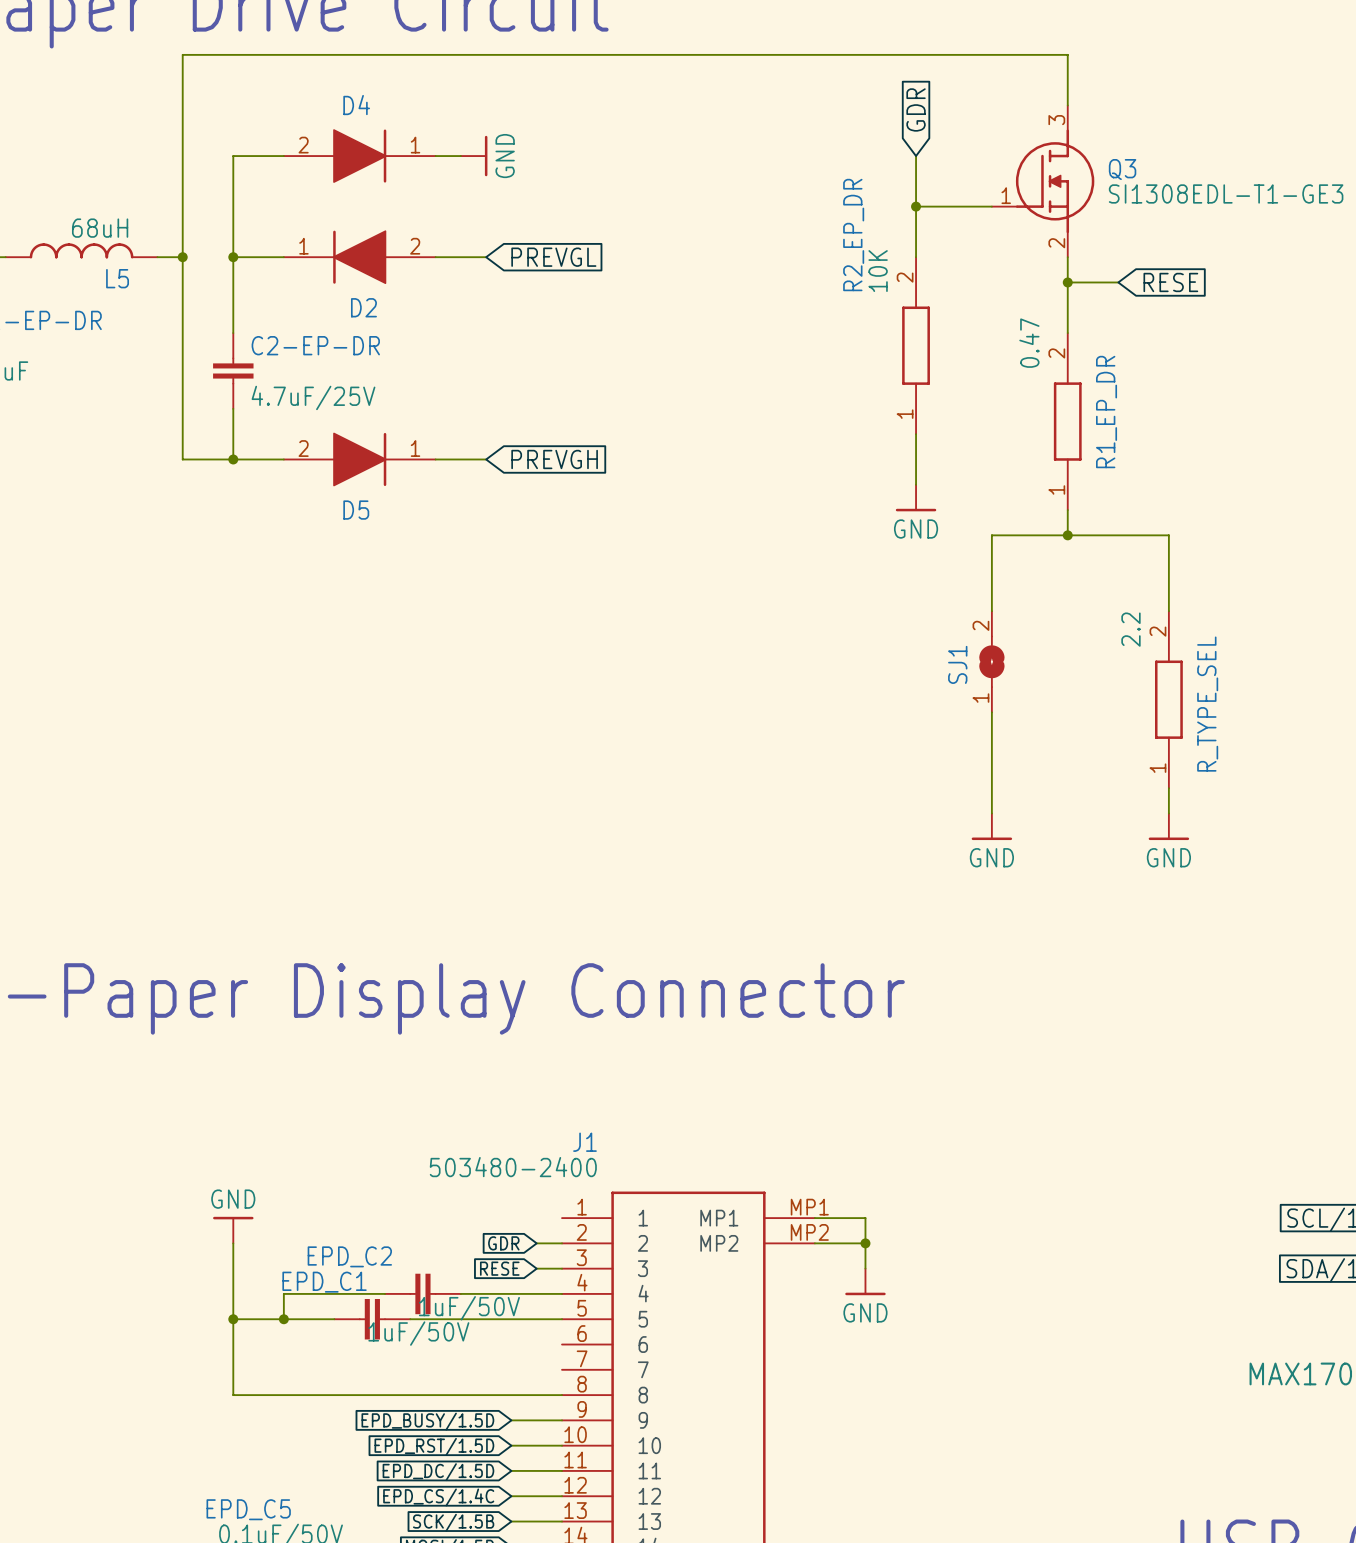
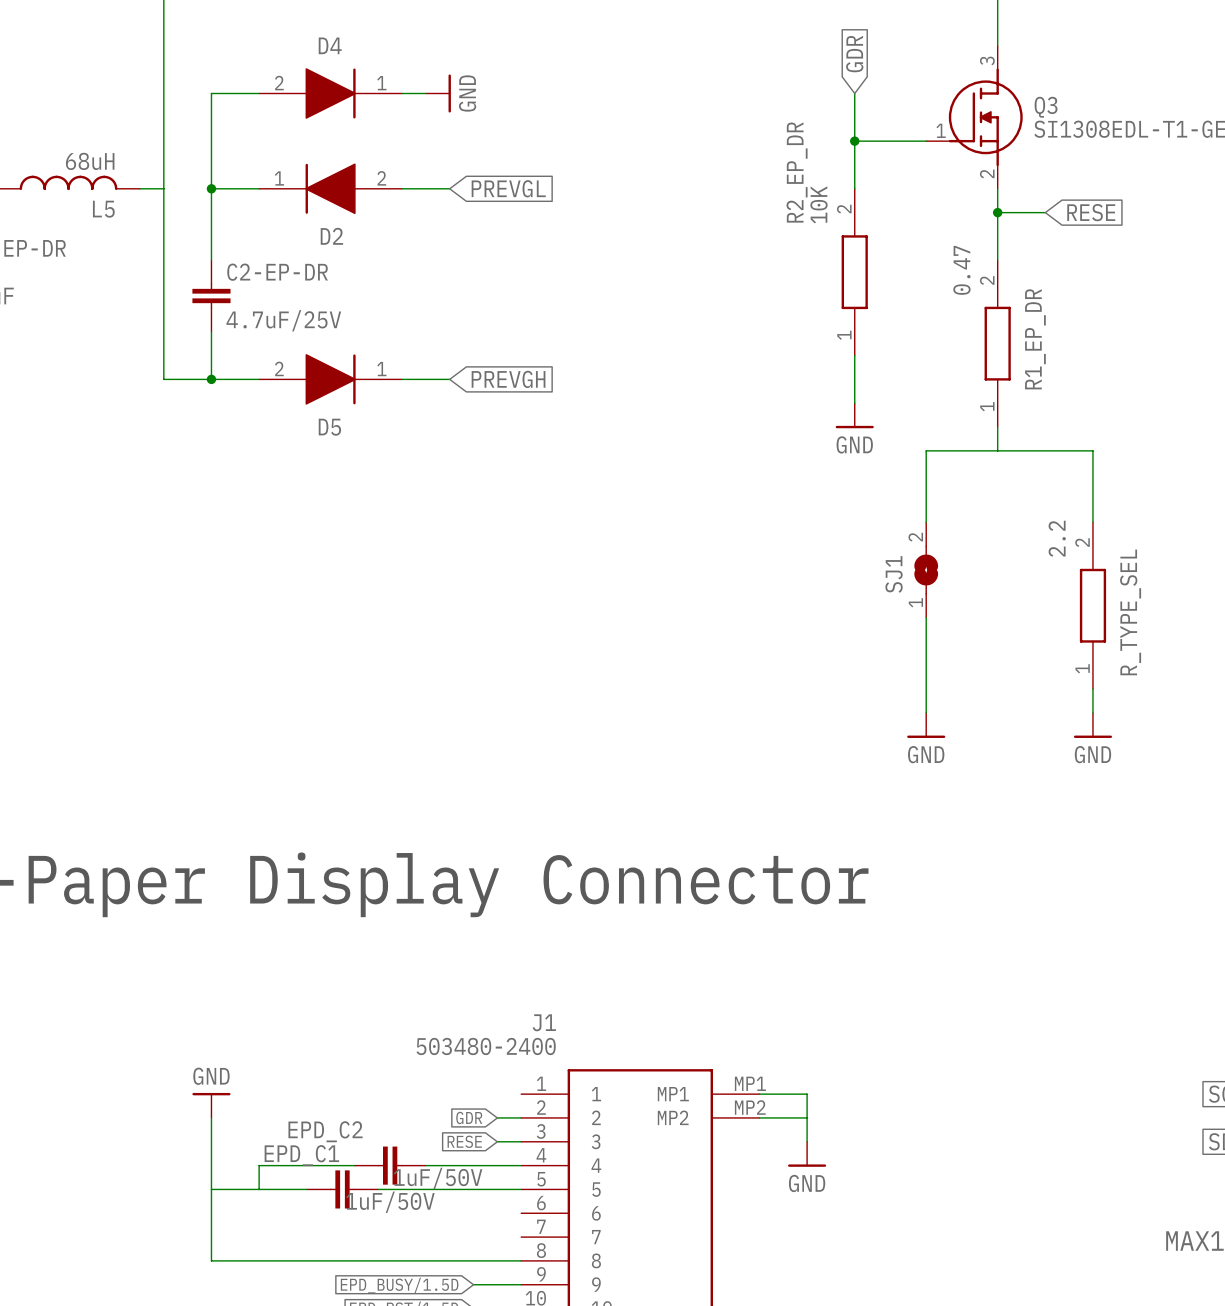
junction: (182, 257) -> none
junction: (1067, 535) -> none
junction: (865, 1243) -> none
junction: (233, 1319) -> none
junction: (283, 1319) -> none

